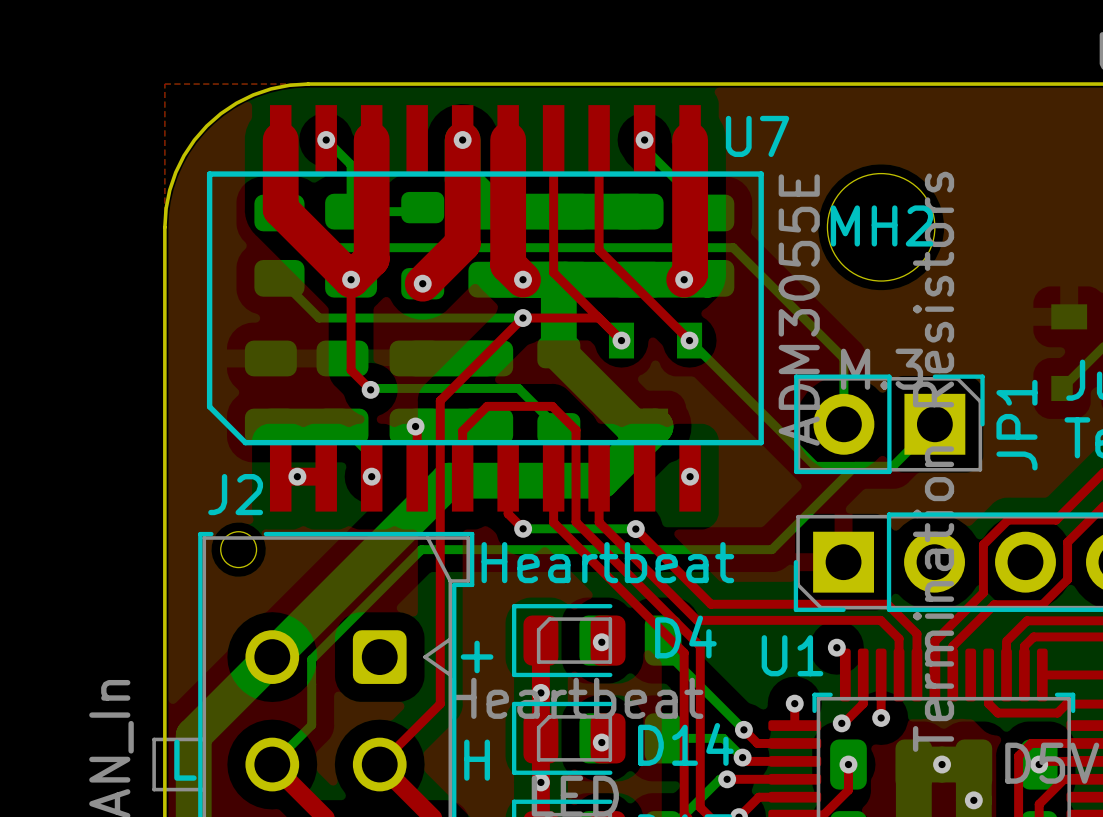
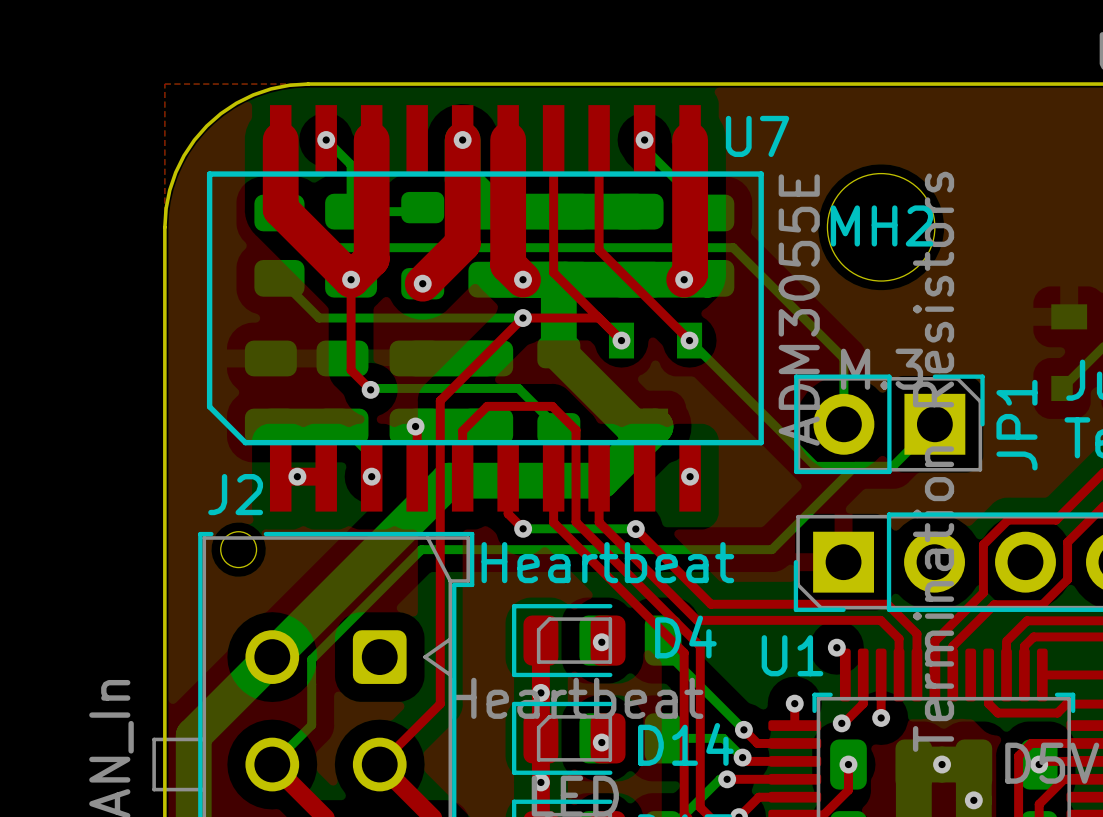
text: + (477, 656) -> none
text: L (185, 760) -> none
text: H (477, 760) -> none

